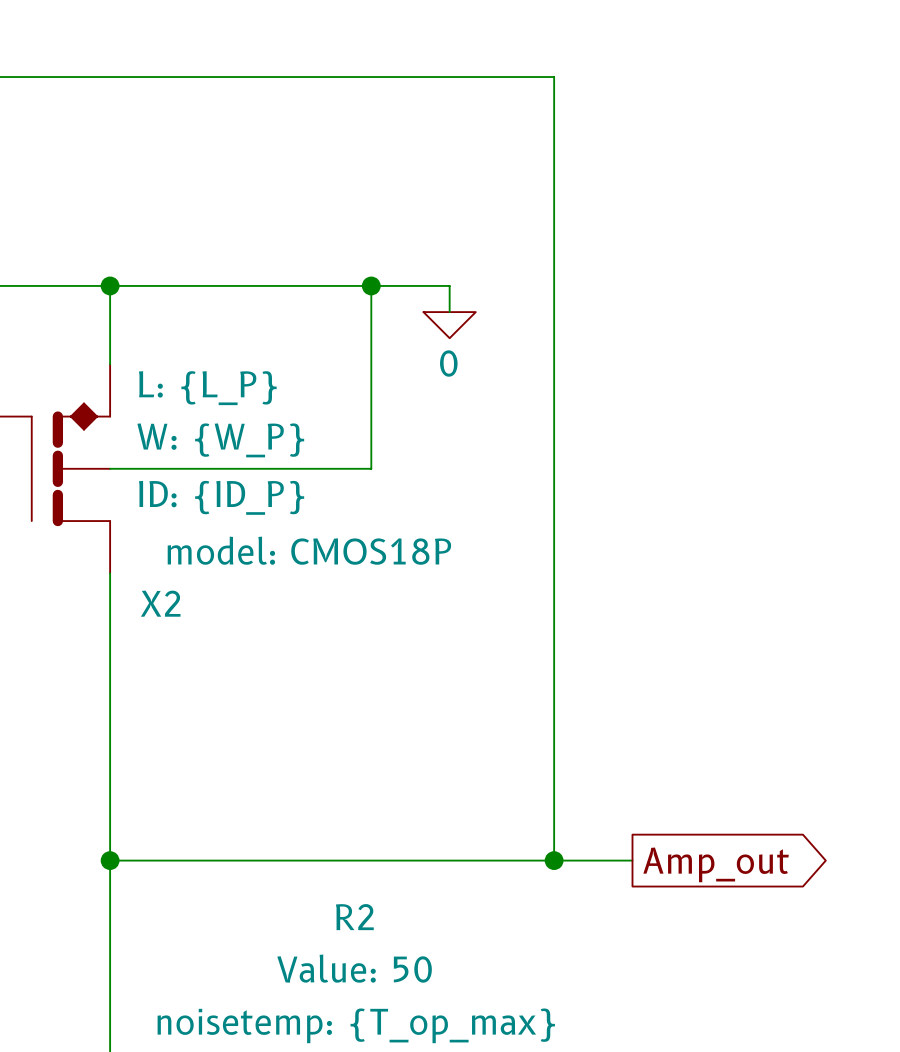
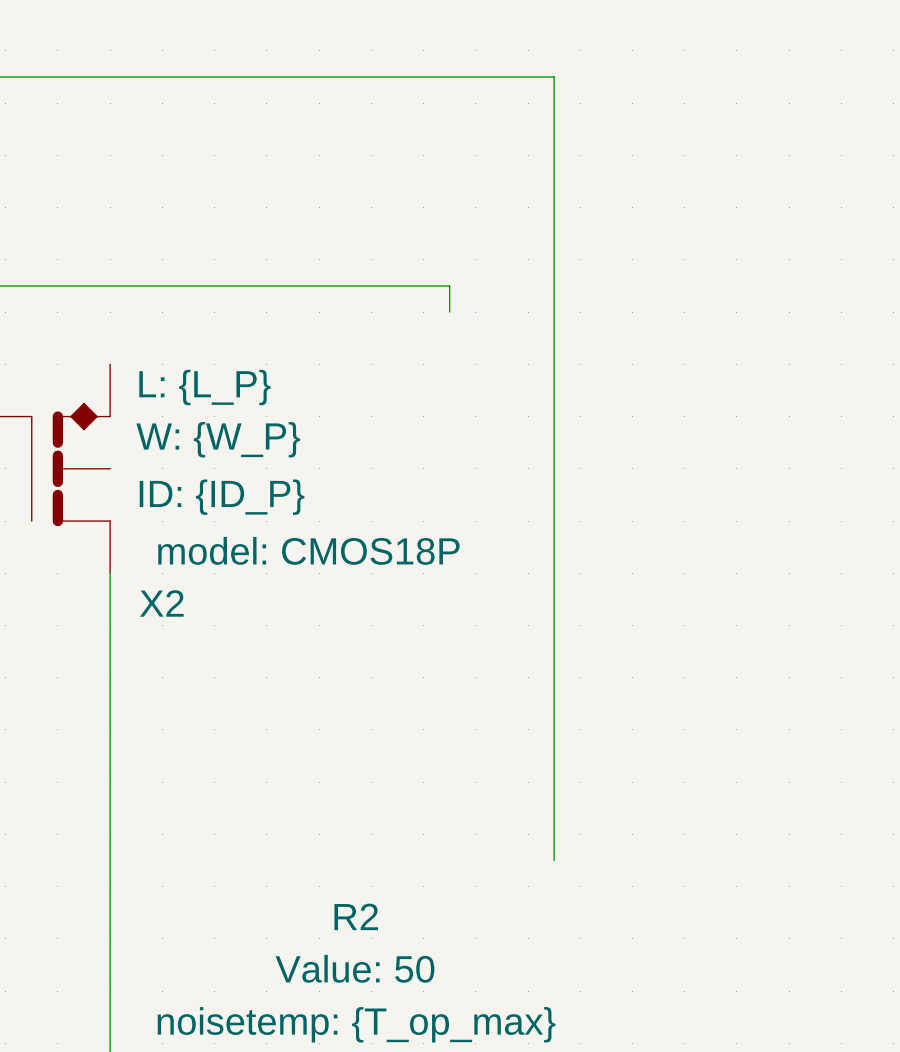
wire: (110, 285) (110, 364) -> none
junction: (110, 285) -> none
wire: (371, 285) (371, 468) (110, 468) -> none
junction: (371, 285) -> none
power symbol: 0 (449, 325) -> none
wire: (110, 860) (632, 860) -> none
junction: (110, 860) -> none
junction: (554, 860) -> none
global label: Amp_out (716, 864) -> none

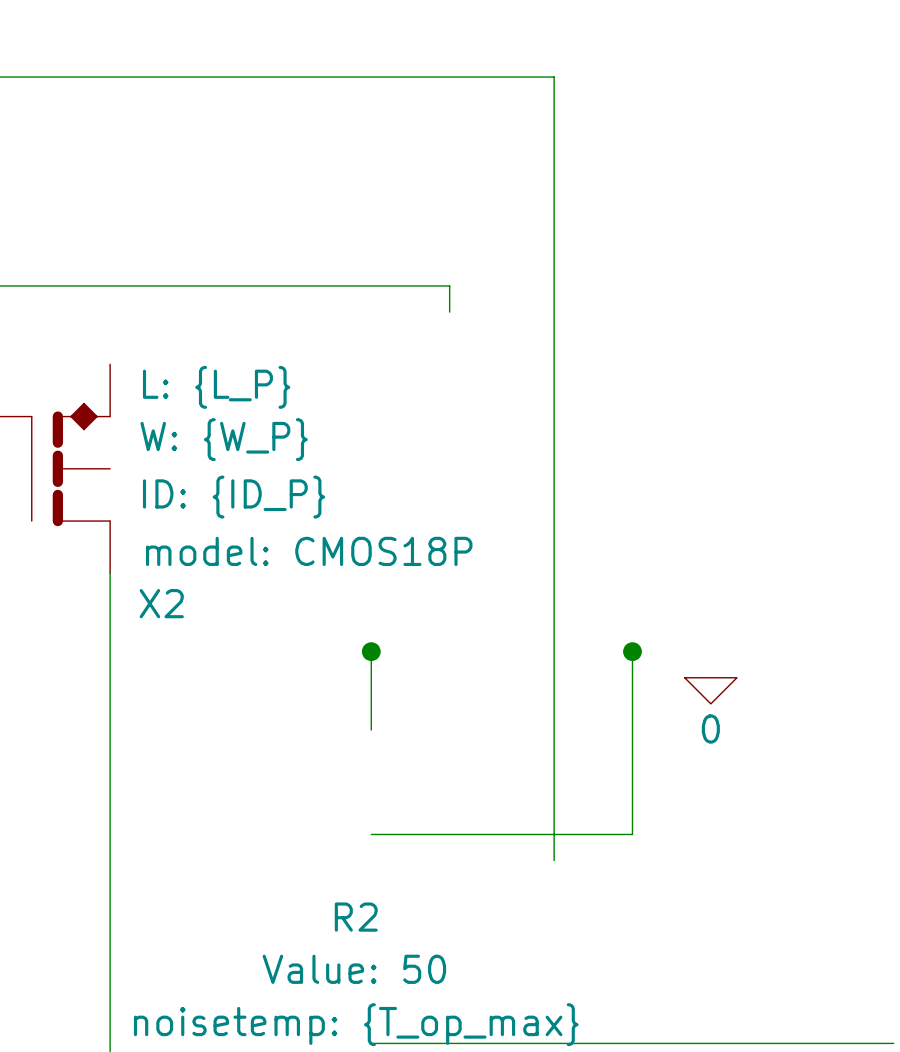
wire: none -> (371, 651) (371, 729)
junction: none -> (371, 651)
wire: none -> (632, 651) (632, 834) (371, 834)
junction: none -> (632, 651)
power symbol: none -> 0 (710, 690)
wire: none -> (371, 1043) (893, 1043)

